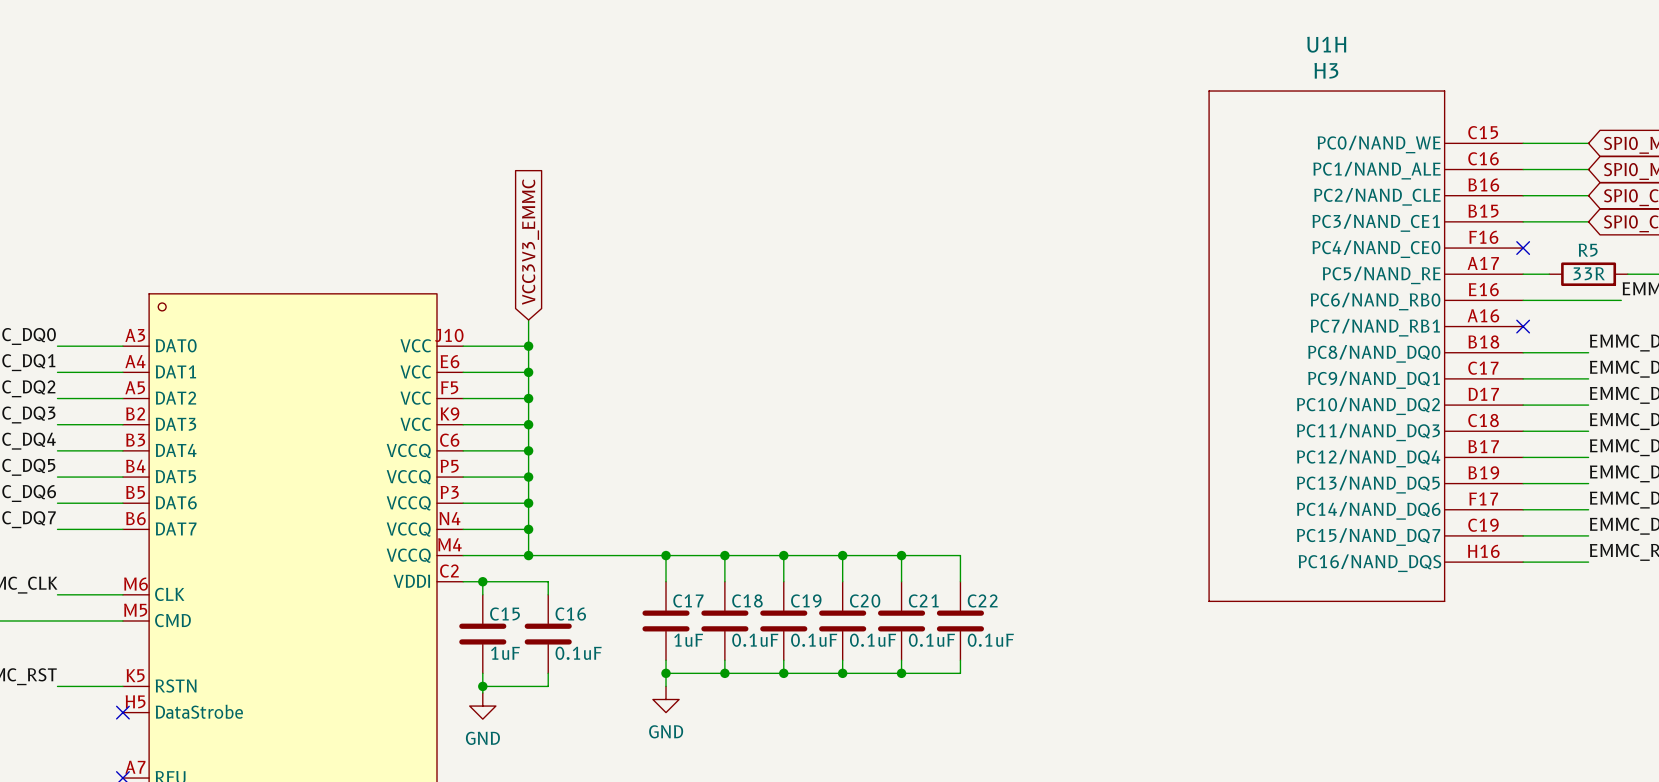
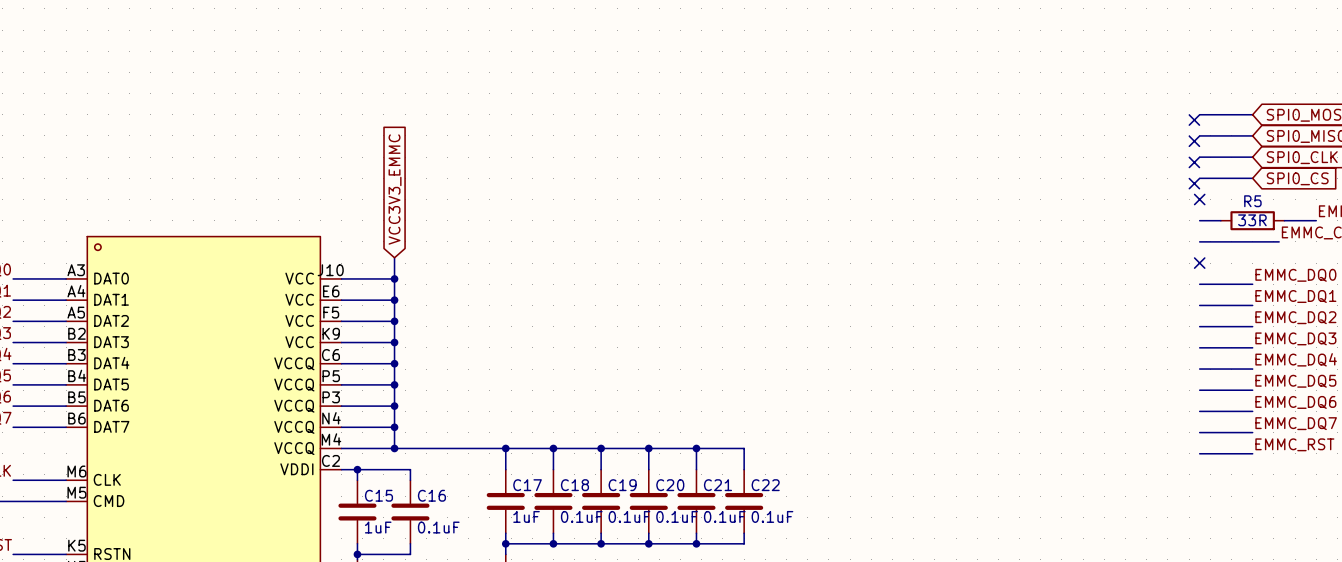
no-connect mark: none -> (1194, 120)
no-connect mark: none -> (1194, 141)
no-connect mark: none -> (1194, 162)
no-connect mark: none -> (1194, 183)
U1H: H3 (1365, 346) -> none

